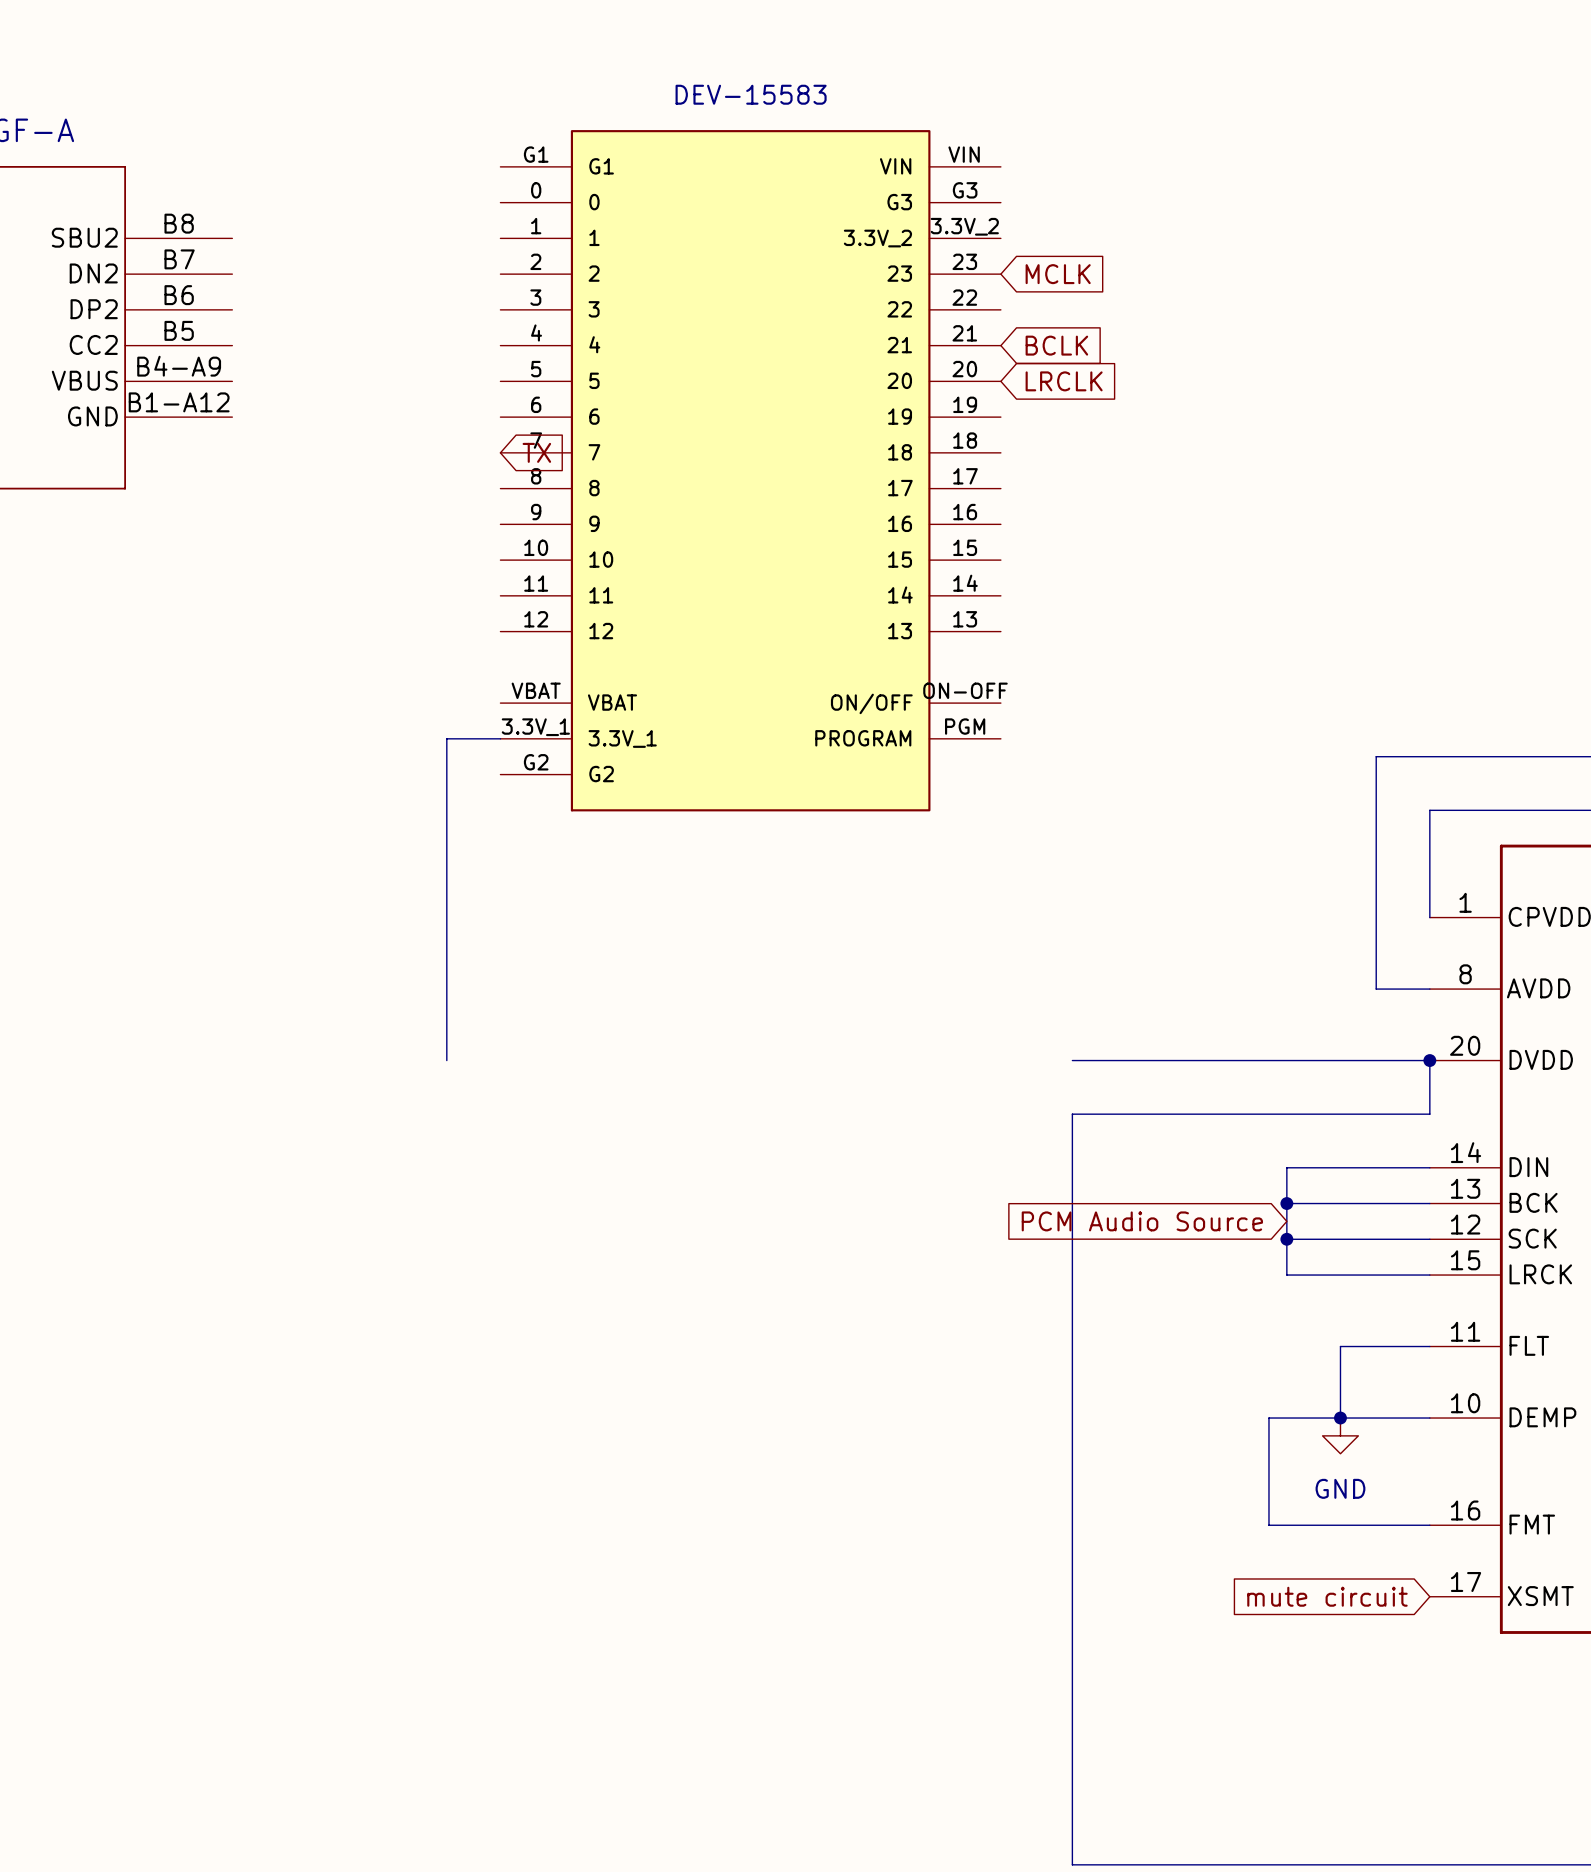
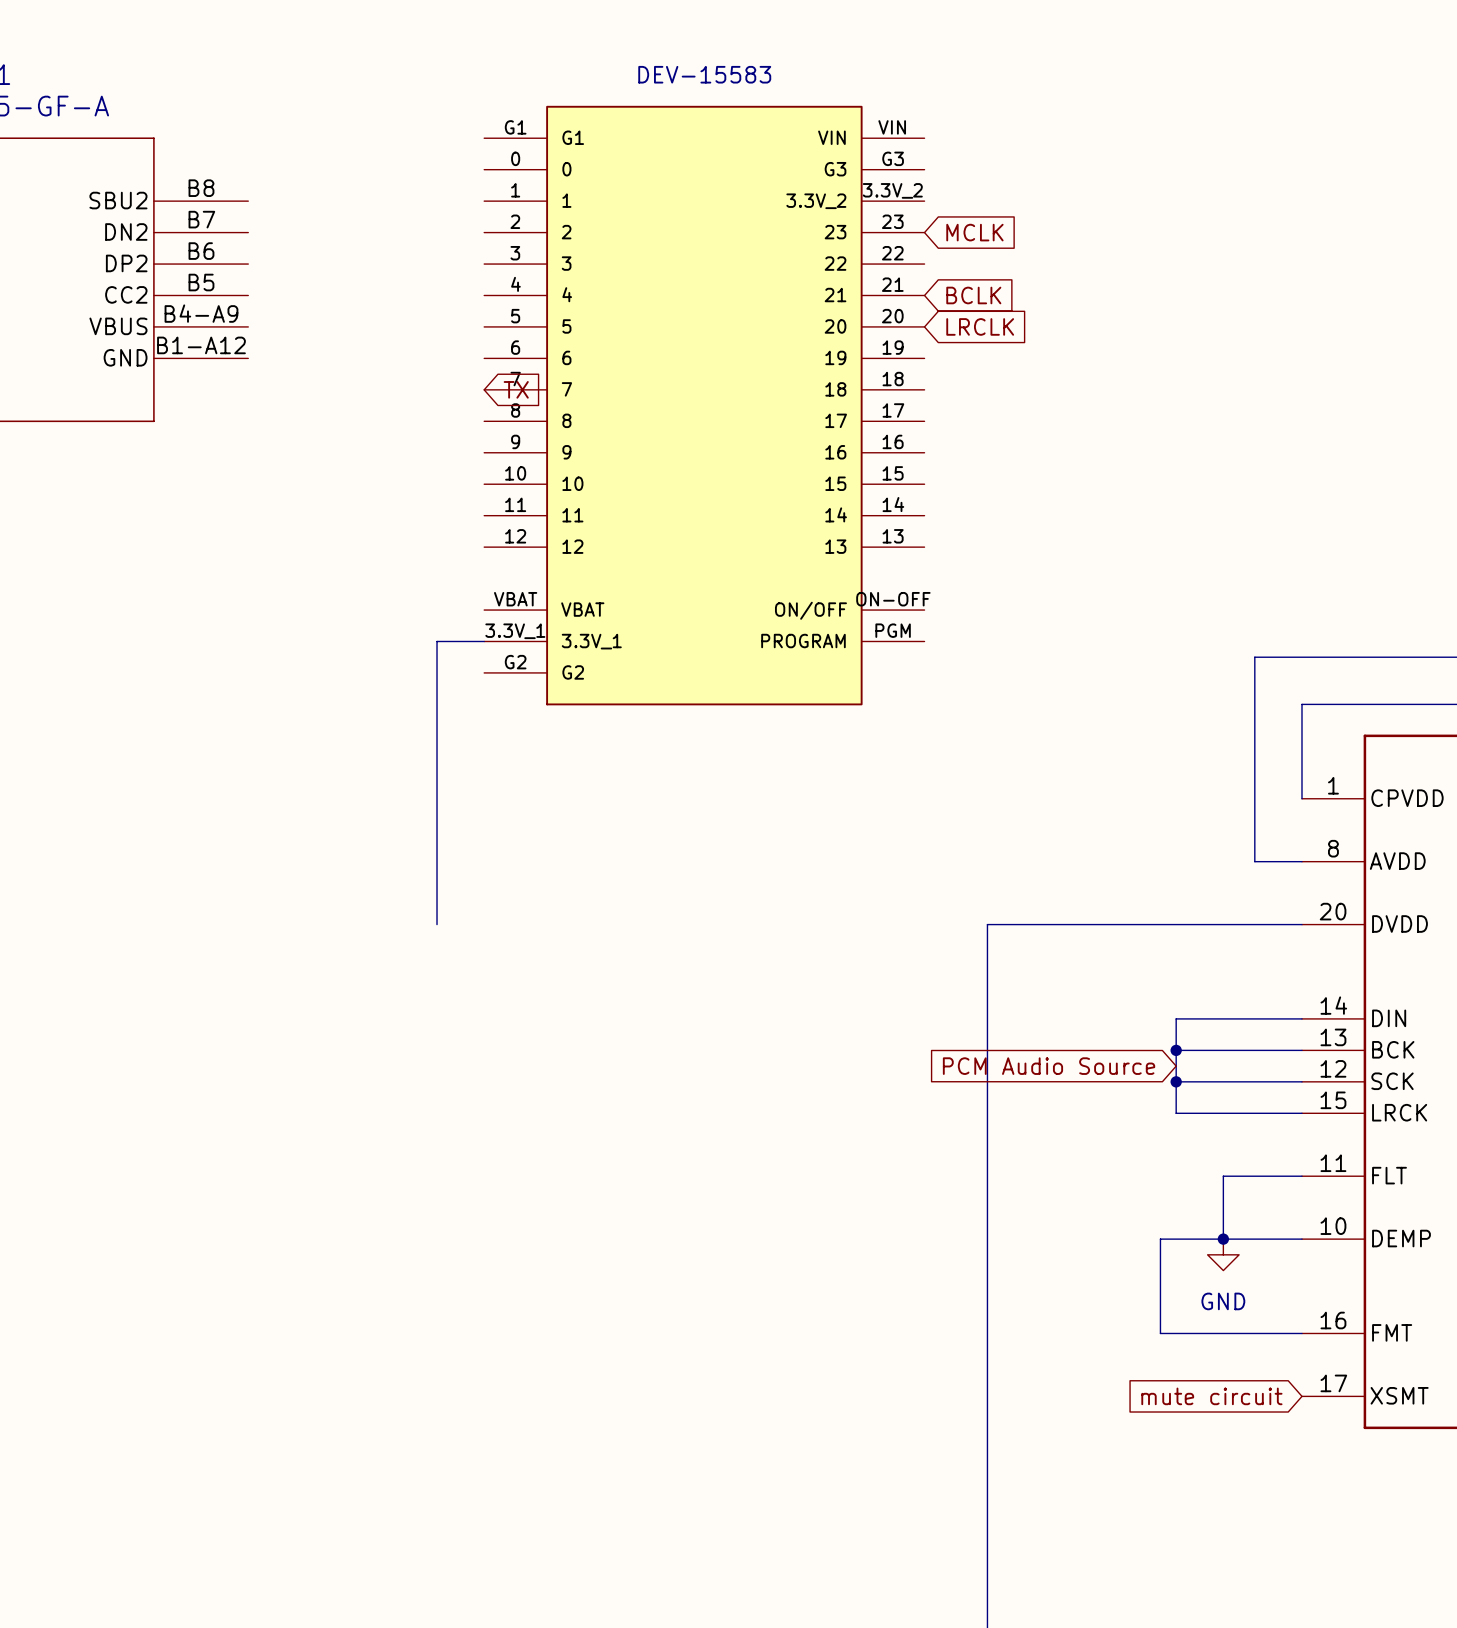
wire: (1429, 1060) (1429, 1114) (1072, 1114) -> (987, 924) (987, 971)
junction: (1429, 1060) -> none

